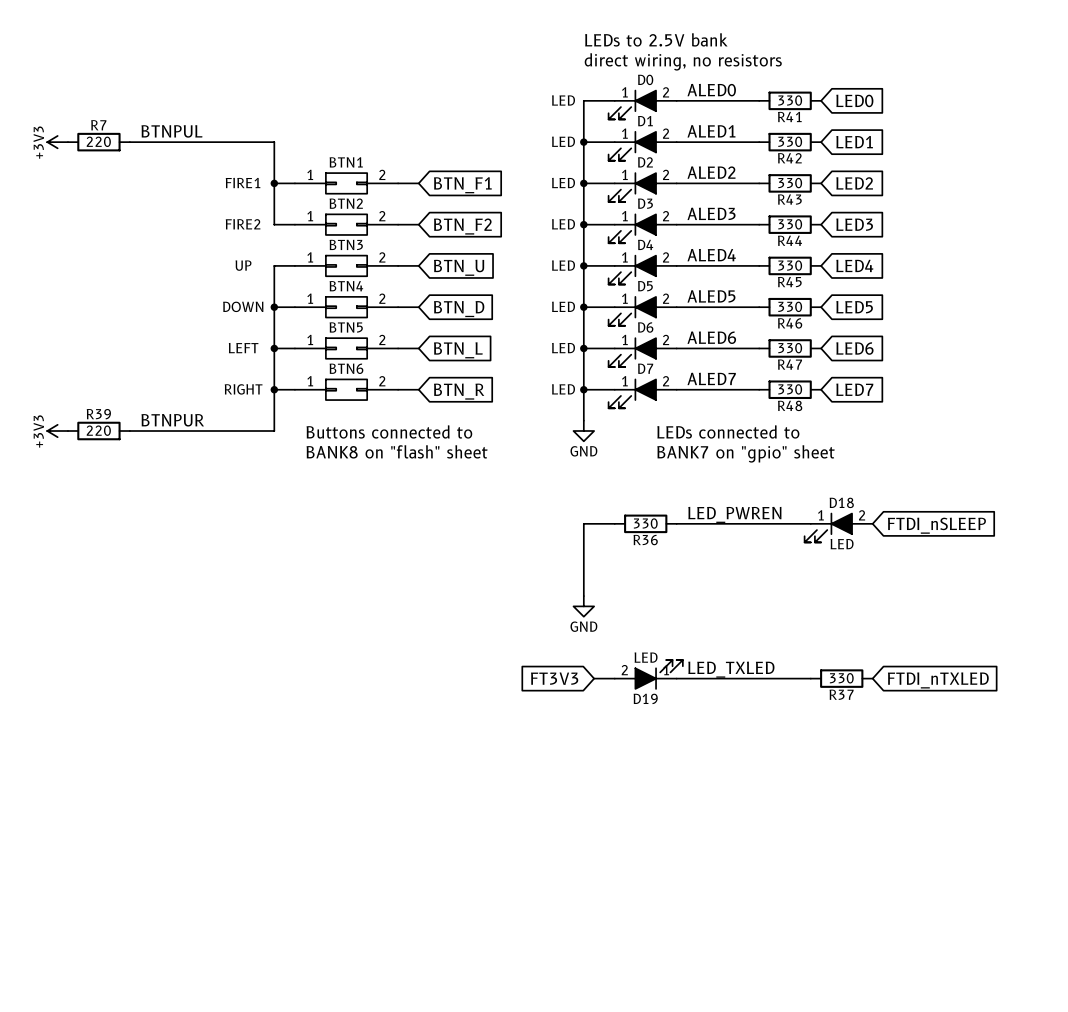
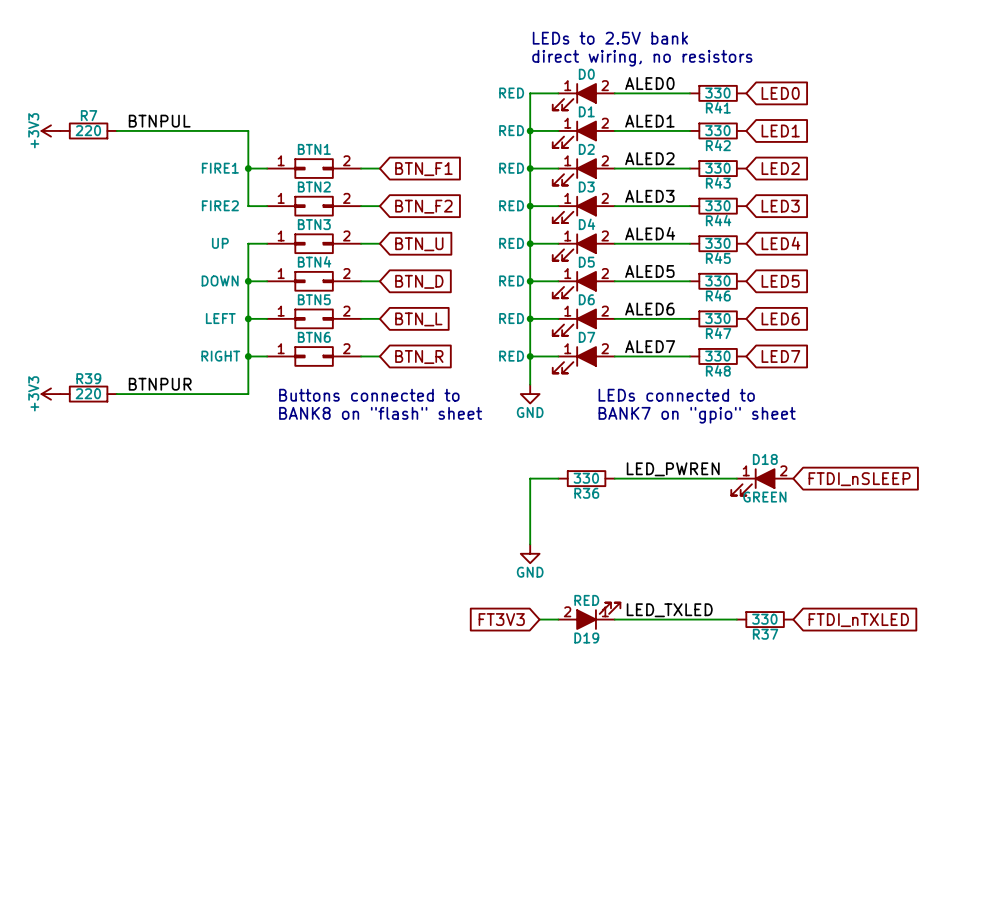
D0 value: LED (563, 100) -> RED (511, 93)
D1 value: LED (563, 141) -> RED (511, 130)
D2 value: LED (563, 183) -> RED (511, 168)
D3 value: LED (563, 224) -> RED (511, 205)
D4 value: LED (563, 265) -> RED (511, 243)
D5 value: LED (563, 306) -> RED (511, 280)
D6 value: LED (563, 348) -> RED (511, 318)
D7 value: LED (563, 389) -> RED (511, 356)
D18 value: LED (842, 544) -> GREEN (764, 497)
D19 value: LED (646, 657) -> RED (586, 600)

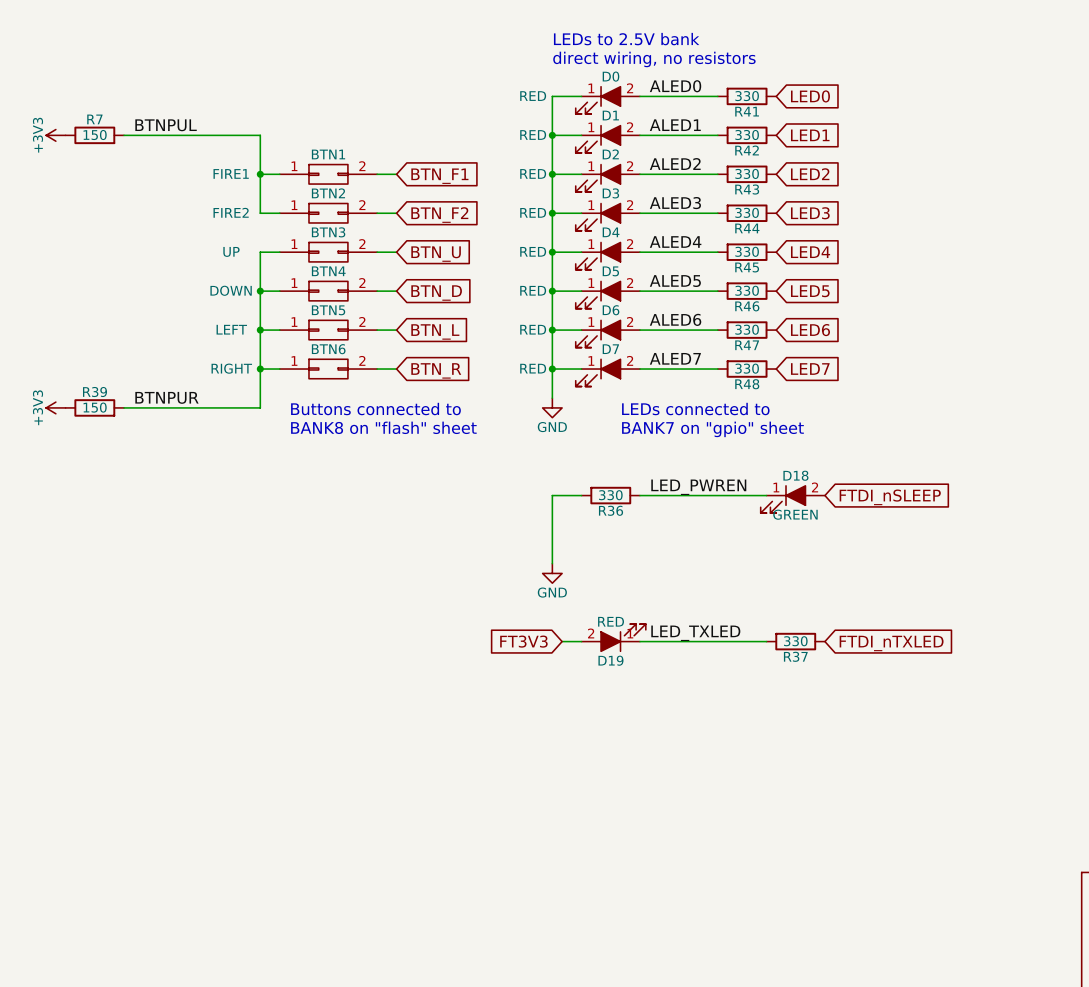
R7 value: 220 (88, 130) -> 150 (95, 135)
R39 value: 220 (88, 393) -> 150 (95, 407)

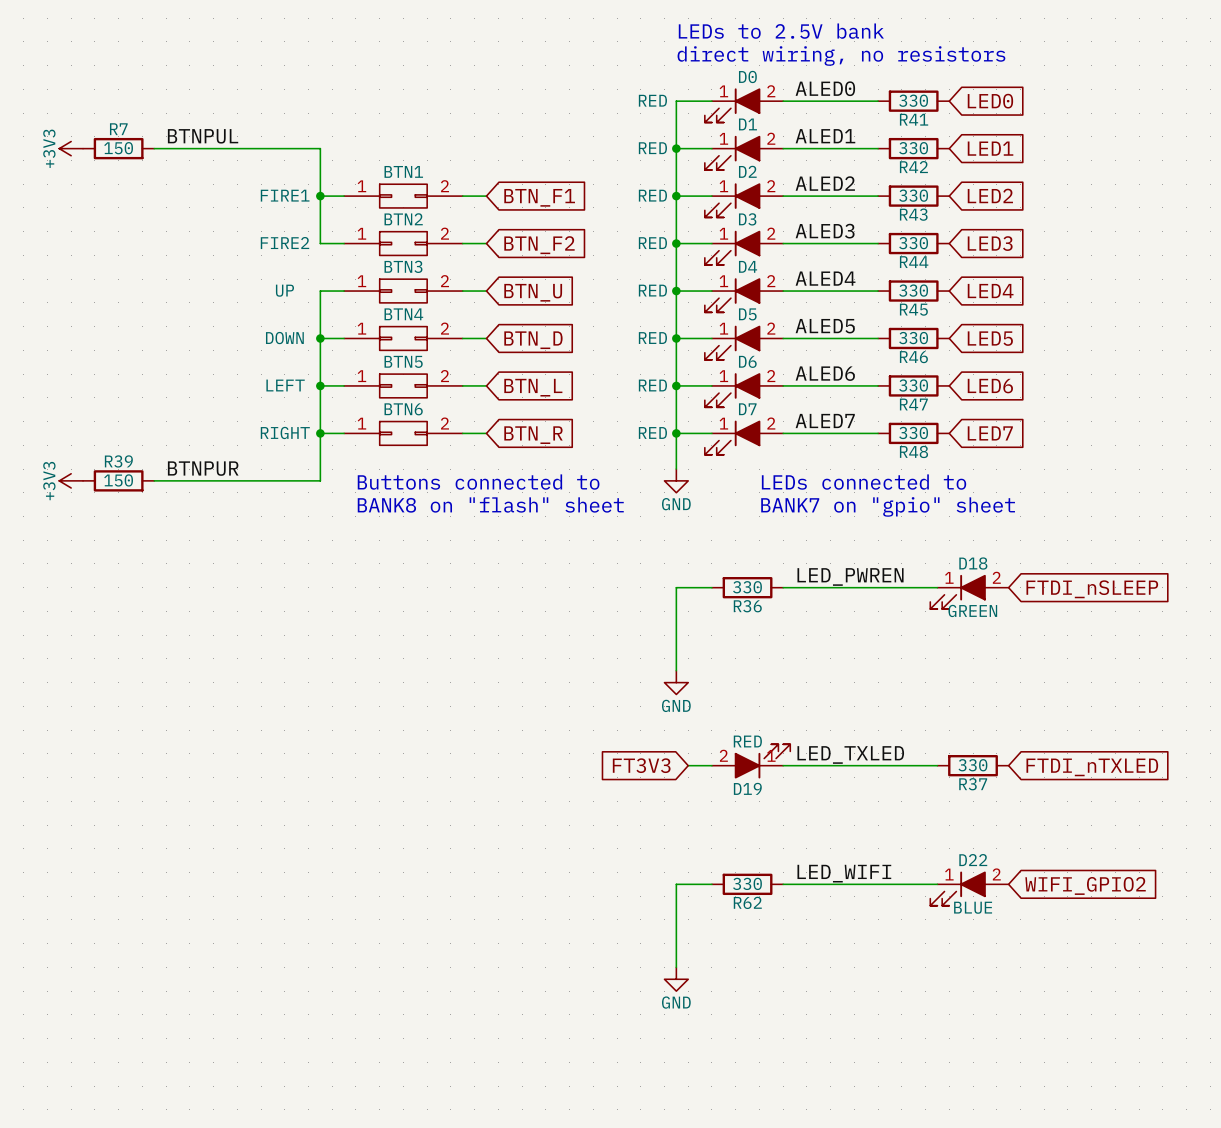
label: none -> LED_WIFI (844, 873)
wire: none -> (711, 884) (676, 884) (676, 967)
R62: none -> 330 (747, 884)
wire: none -> (783, 884) (937, 884)
global label: none -> WIFI_GPIO2 (1085, 885)
D22: none -> BLUE (969, 888)
power symbol: none -> GND (676, 979)

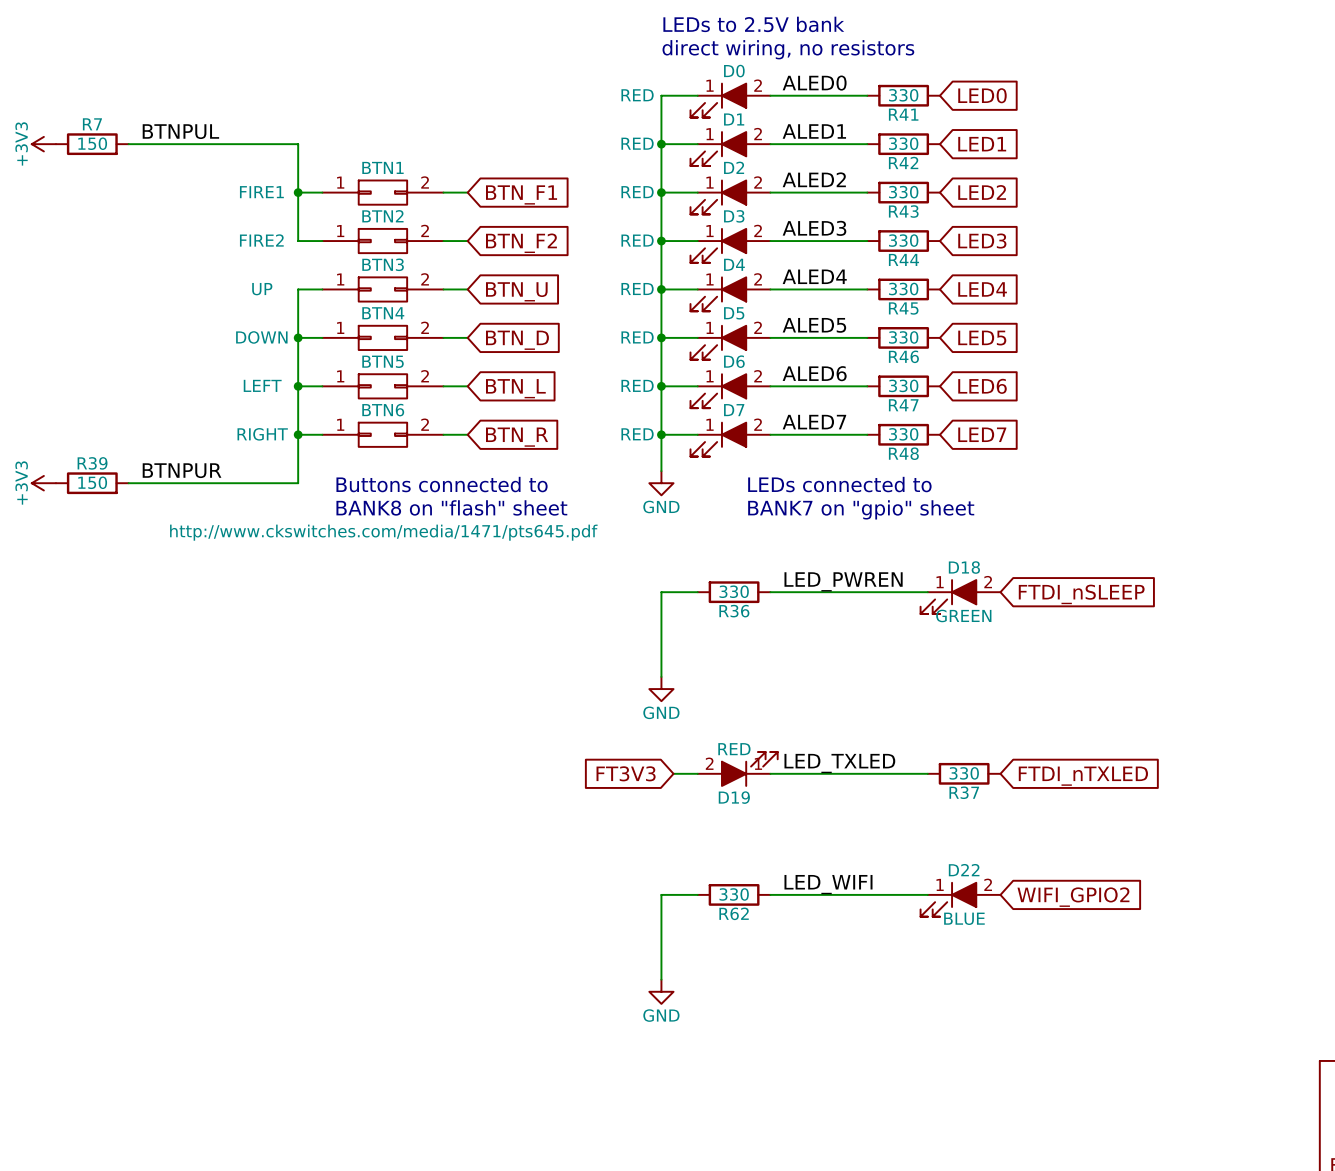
BTN2 text: none -> http://www.ckswitches.com/media/1471/pts645.pdf (383, 532)

